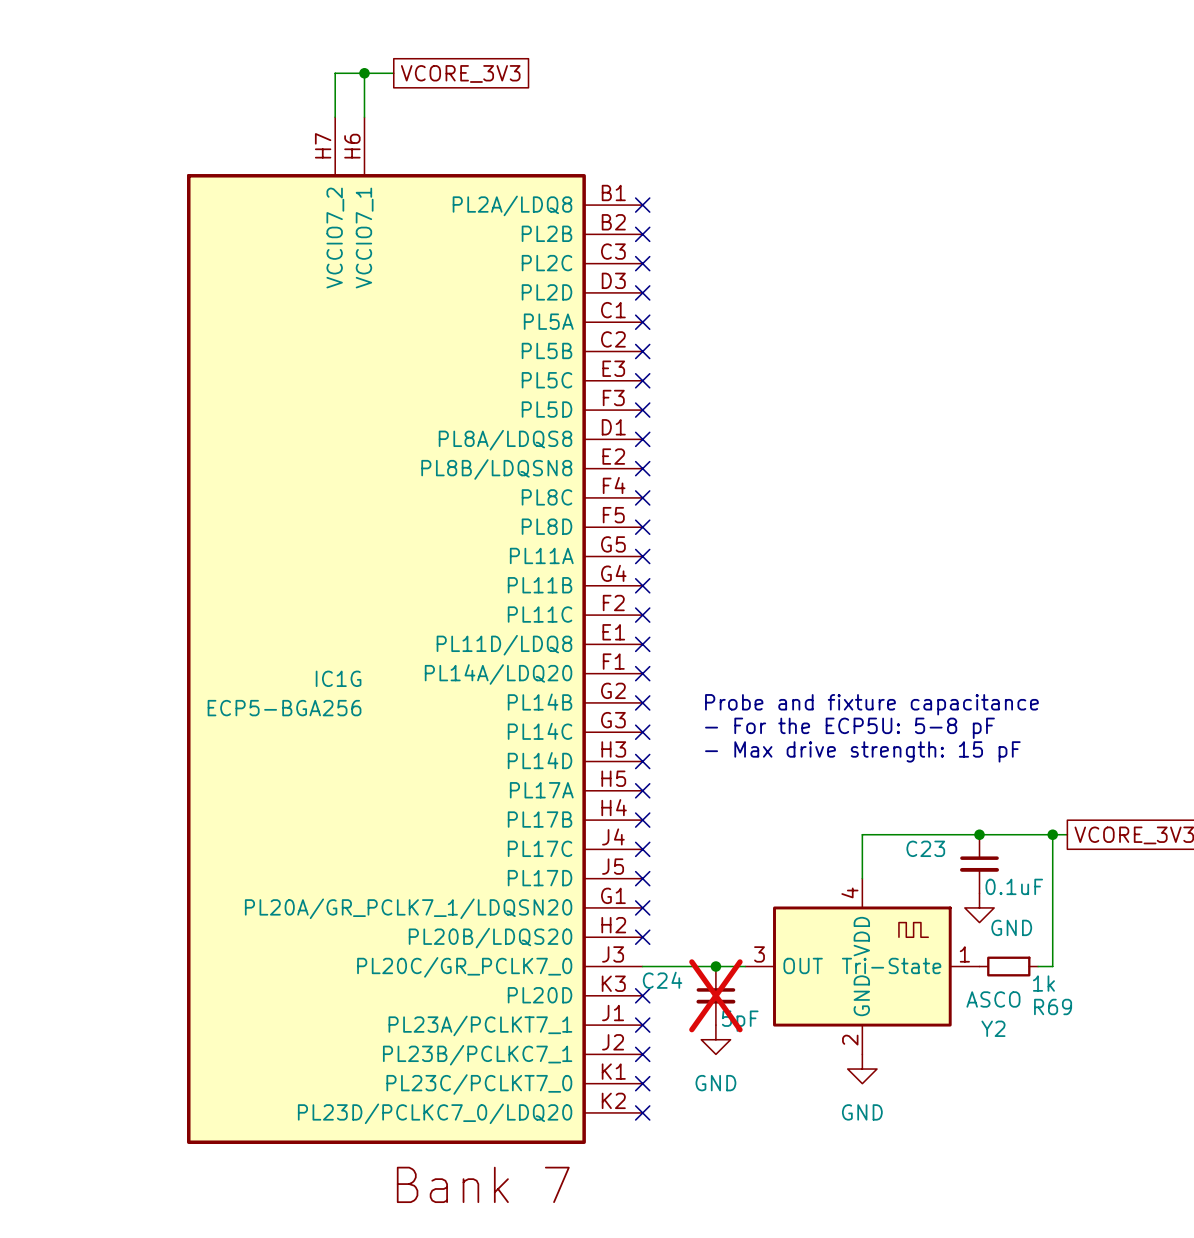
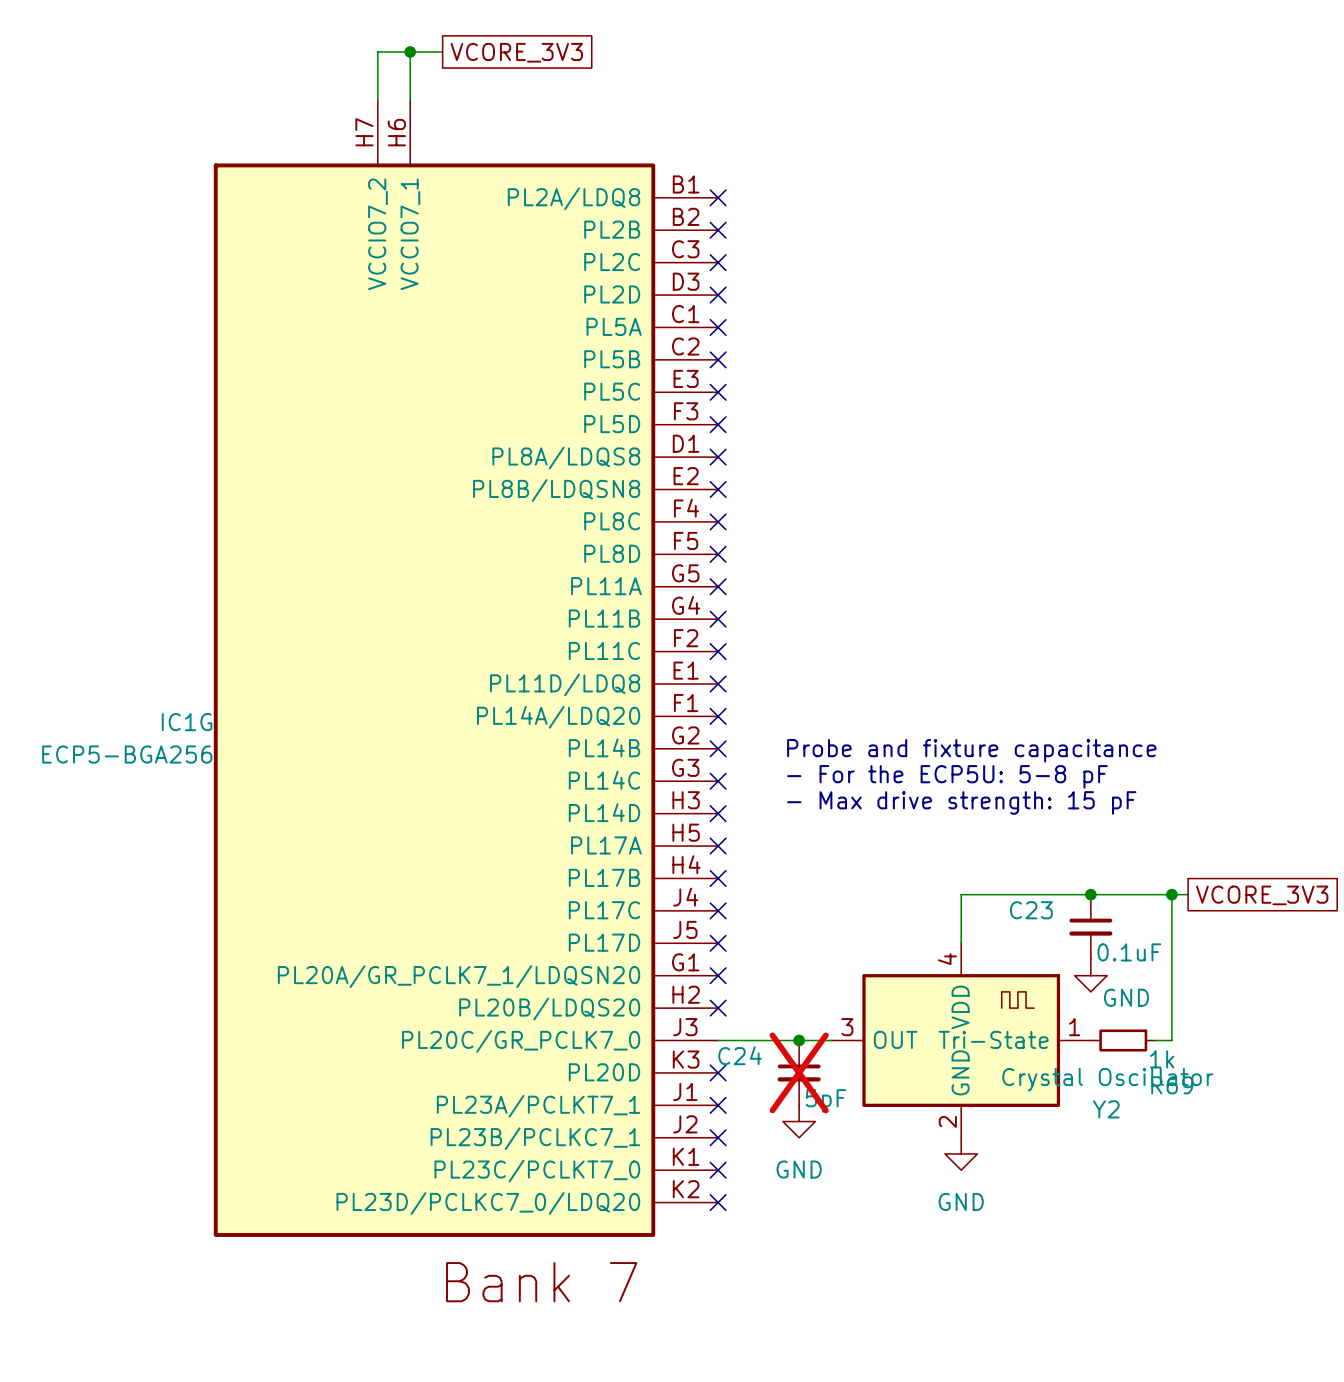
IC1G name position: IC1G (338, 678) -> IC1G (187, 722)
IC1G value position: ECP5-BGA256 (284, 708) -> ECP5-BGA256 (127, 754)
Y2 value: ASCO (993, 999) -> Crystal Oscillator (1107, 1079)

